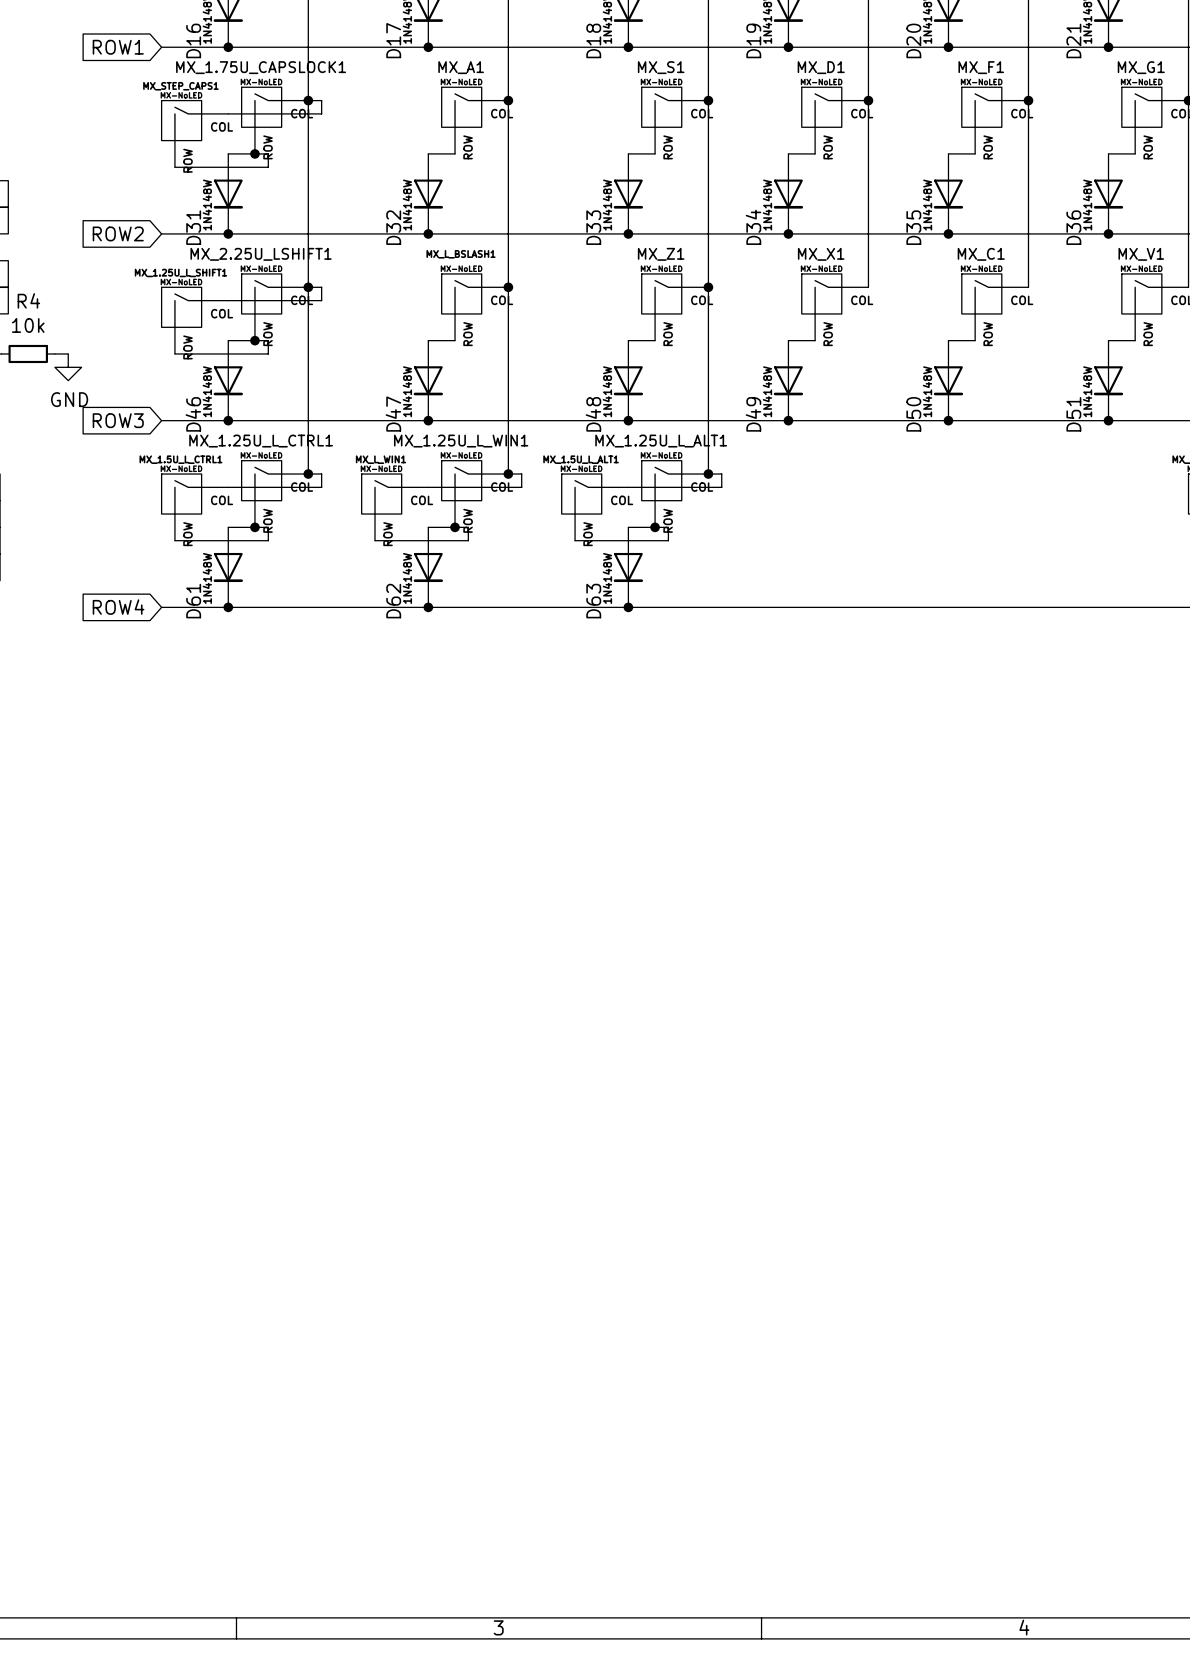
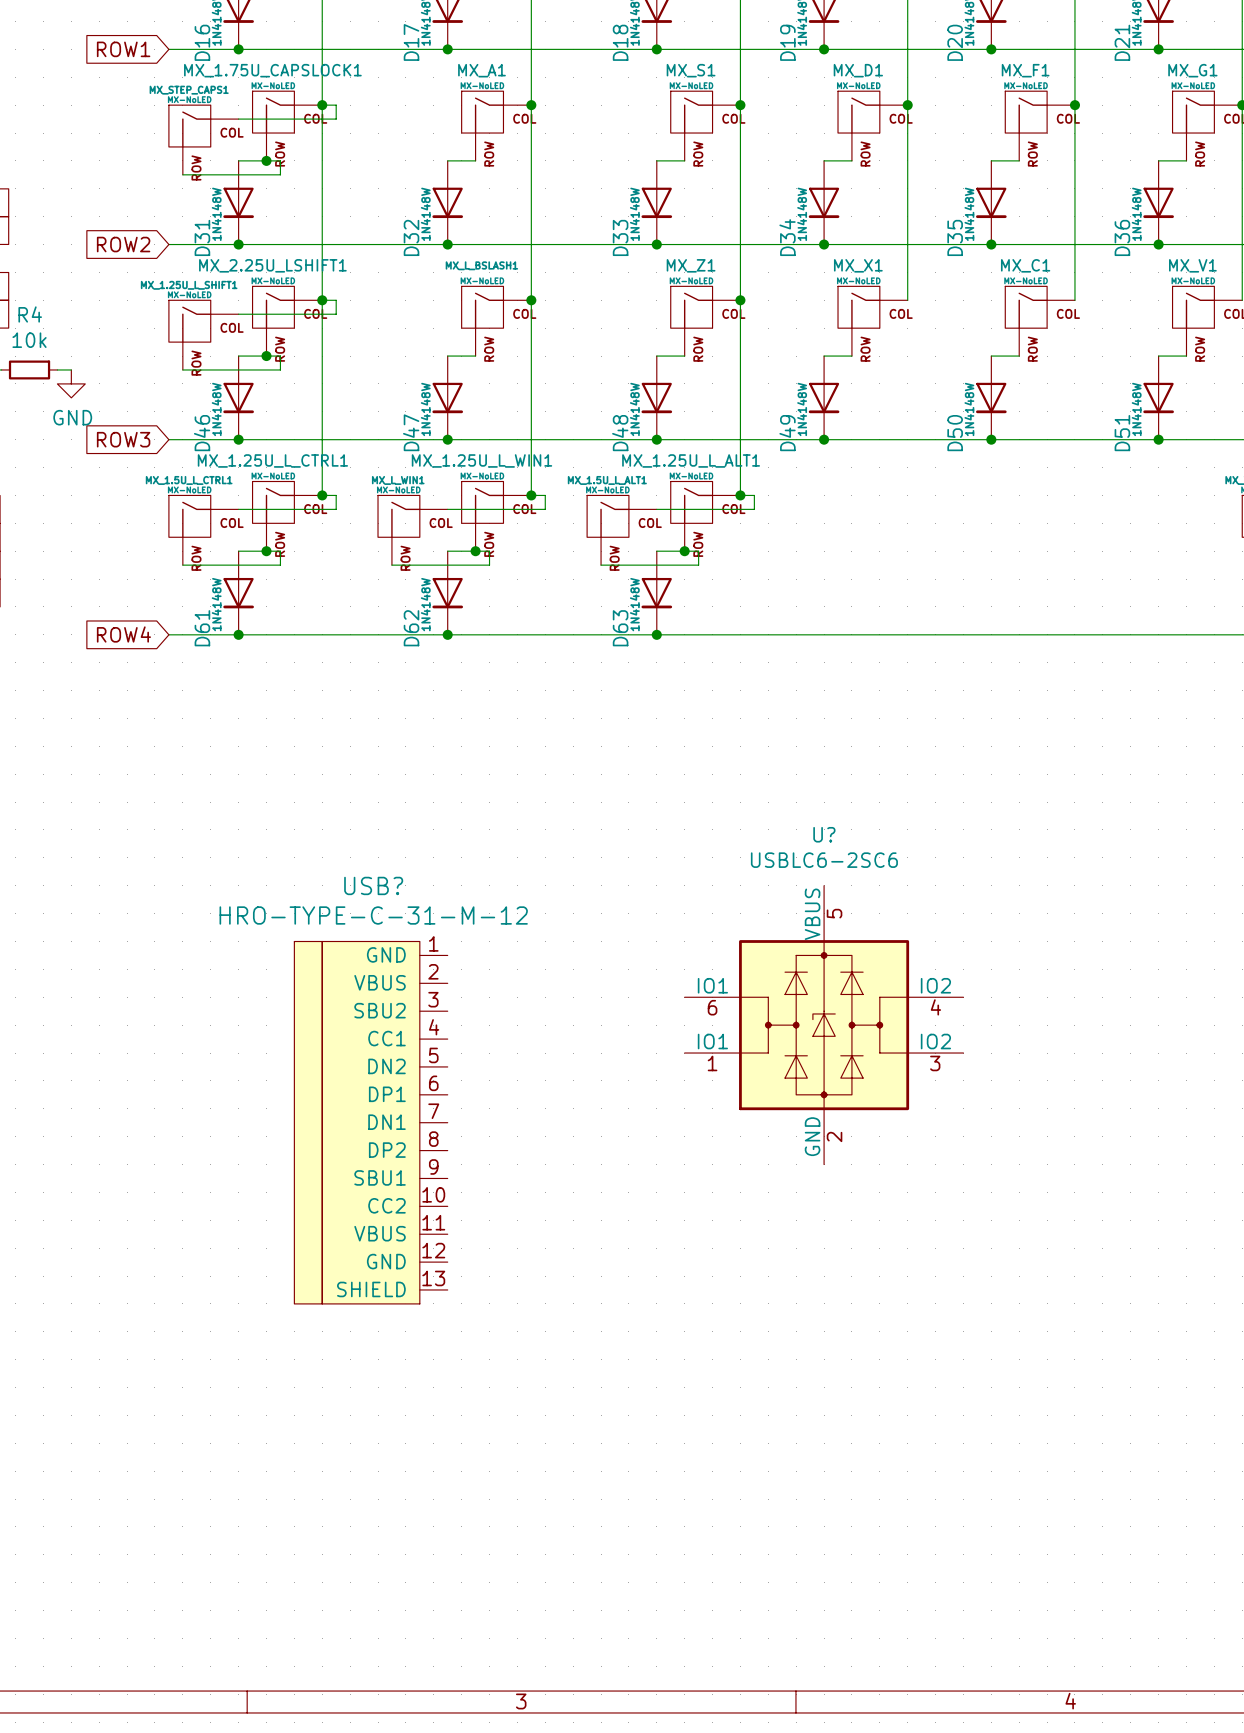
U?: none -> USBLC6-2SC6 (824, 1025)
USB?: none -> HRO-TYPE-C-31-M-12 (371, 1122)

